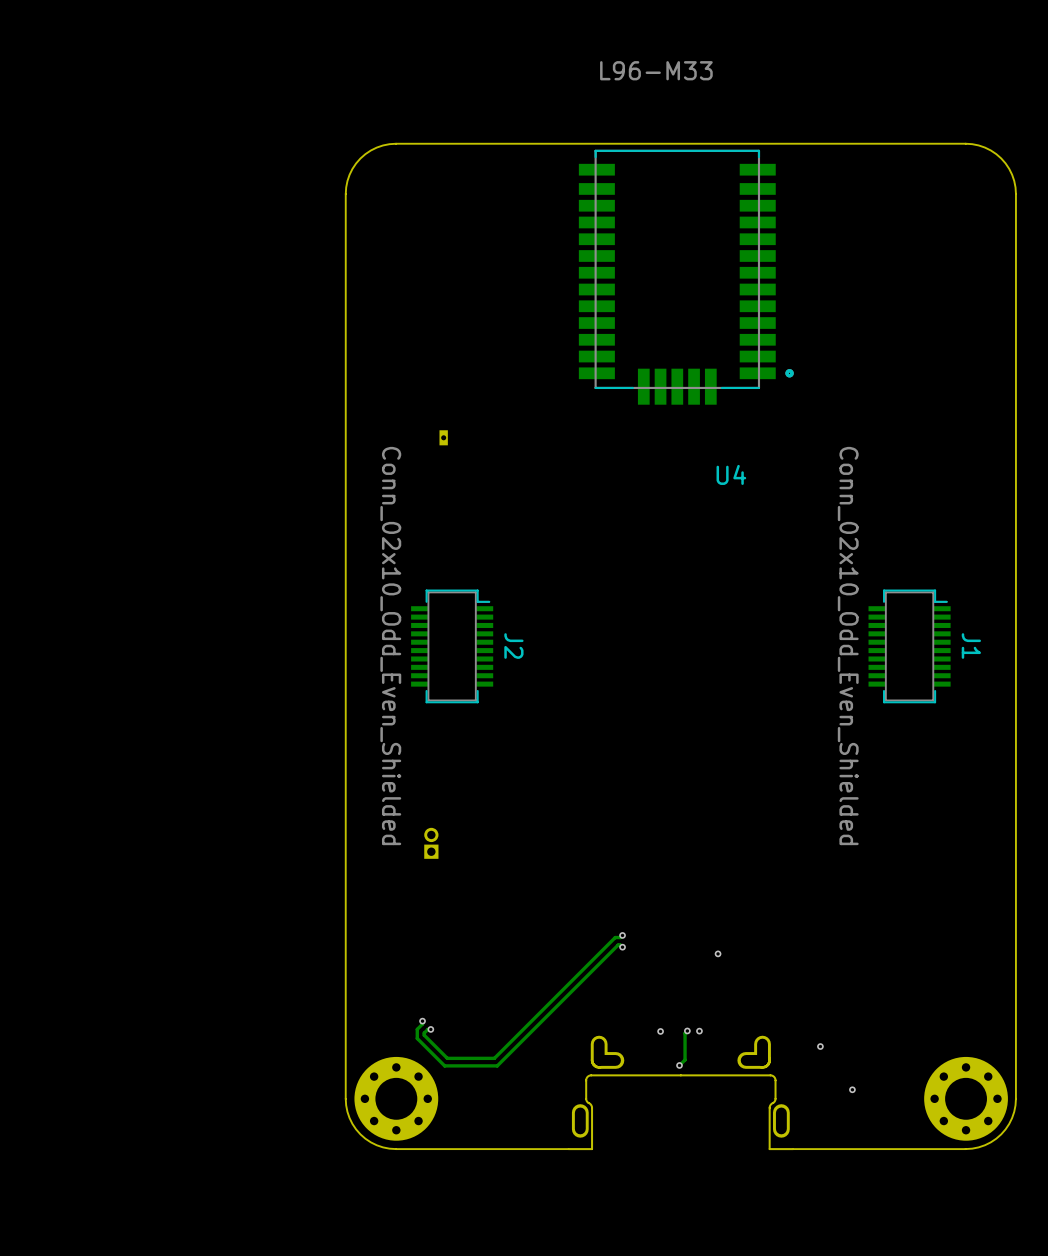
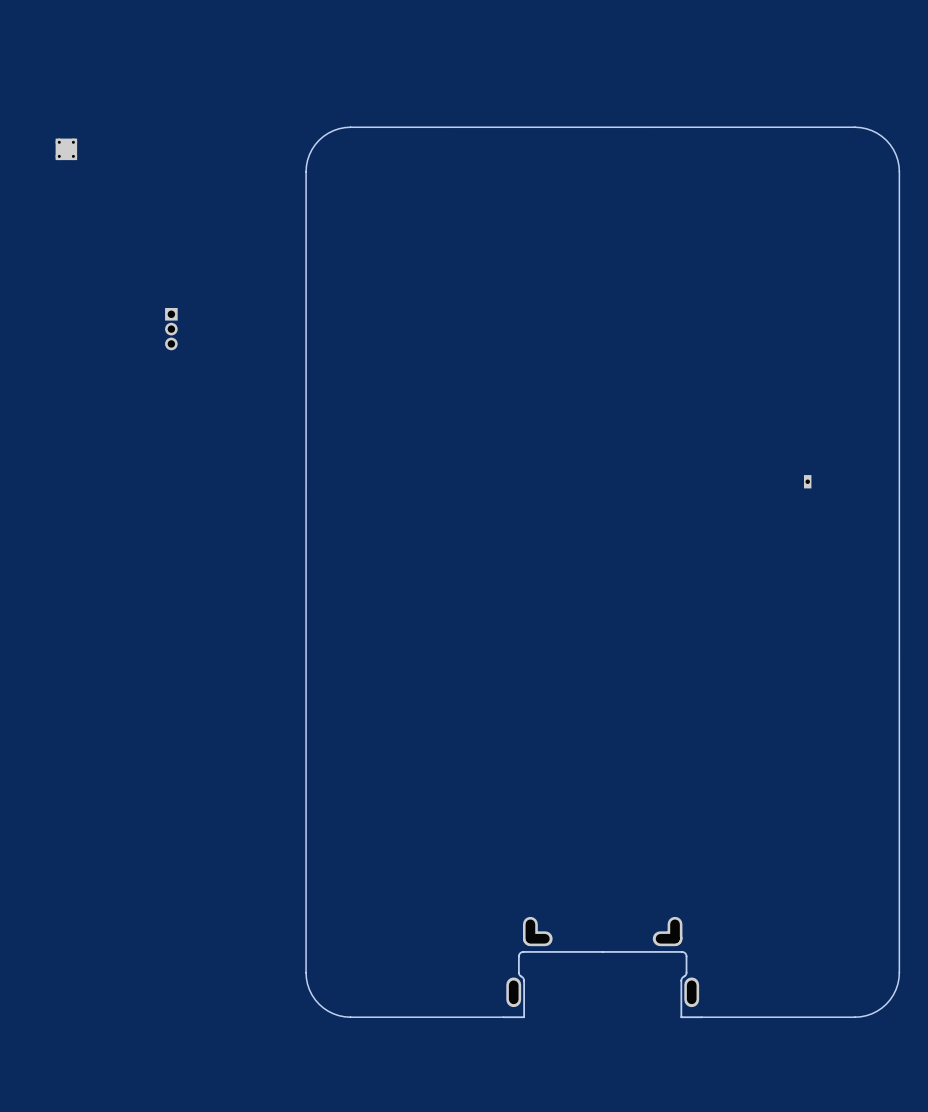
part: none -> (66, 149)
U4: L96-M33 (686, 277) -> none
part: none -> (171, 329)
part: (443, 437) -> none
part: none -> (807, 481)
J2: Conn_02x10_Odd_Even_Shielded (452, 646) -> none
J1: Conn_02x10_Odd_Even_Shielded (909, 646) -> none
part: (431, 843) -> none
track: (622, 935) (615, 937) (494, 1058) (447, 1058) (424, 1035) (427, 1029) (430, 1029) -> none
via: (622, 935) -> none
track: (622, 947) (618, 945) (497, 1065) (444, 1065) (417, 1038) (417, 1029) (422, 1024) (422, 1021) -> none
via: (622, 947) -> none
via: (718, 953) -> none
via: (422, 1021) -> none
via: (430, 1029) -> none
track: (687, 1030) (685, 1033) (685, 1059) (679, 1065) -> none
via: (687, 1030) -> none
via: (660, 1031) -> none
via: (699, 1031) -> none
via: (820, 1046) -> none
via: (679, 1065) -> none
via: (852, 1089) -> none
part: (396, 1098) -> none
part: (966, 1098) -> none

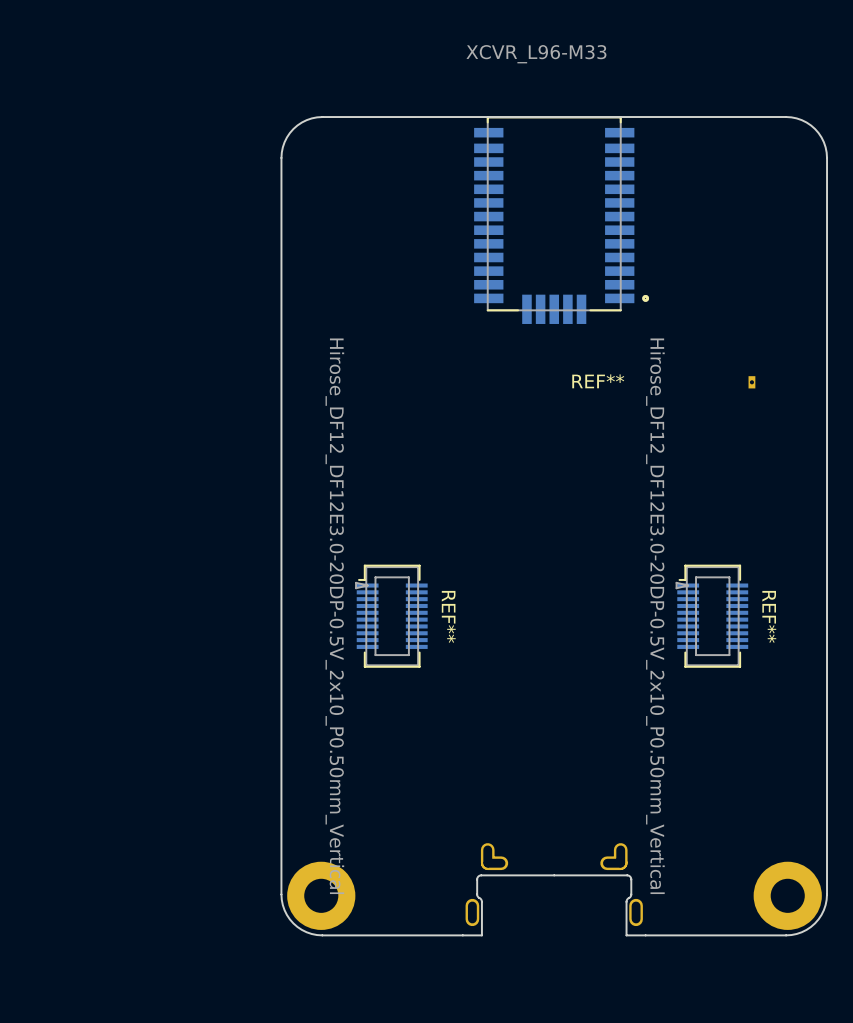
part: (66, 149) -> none
REF**: none -> XCVR_L96-M33 (561, 220)
part: (171, 329) -> none
part position: (807, 481) -> (751, 382)
REF**: none -> Hirose_DF12_DF12E3.0-20DP-0.5V_2x10_P0.50mm_Vertical (391, 616)
REF**: none -> Hirose_DF12_DF12E3.0-20DP-0.5V_2x10_P0.50mm_Vertical (712, 616)
part: none -> (321, 895)
part: none -> (787, 895)

